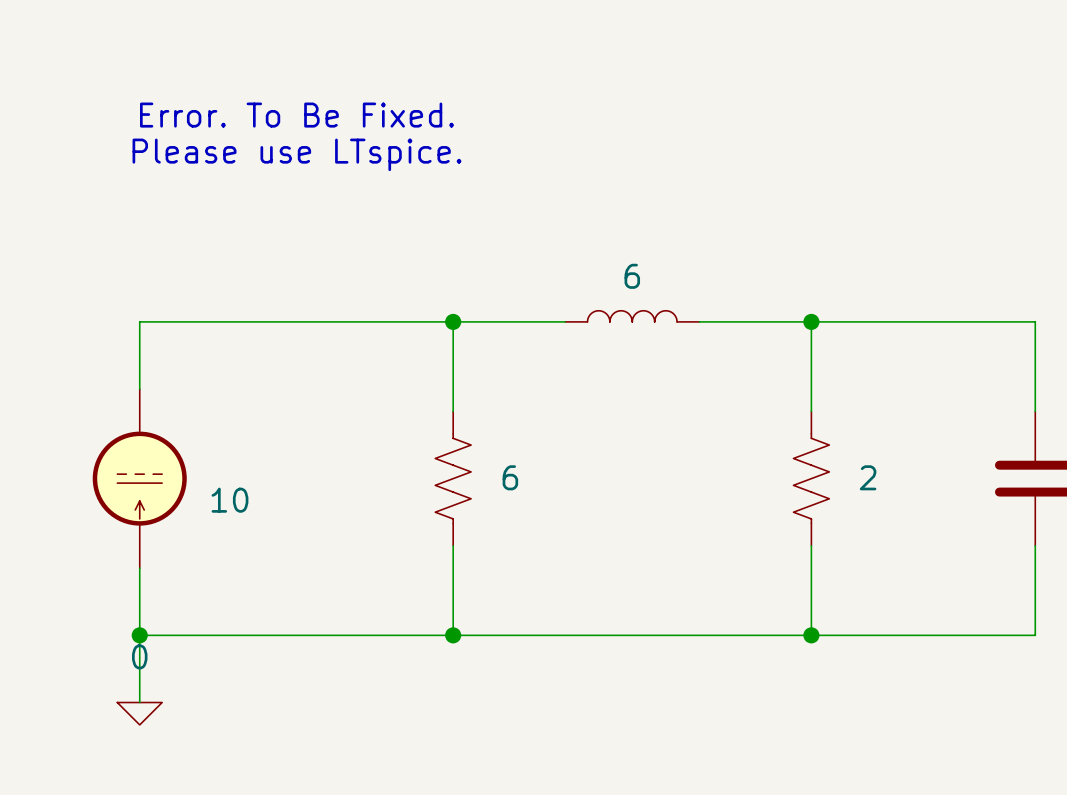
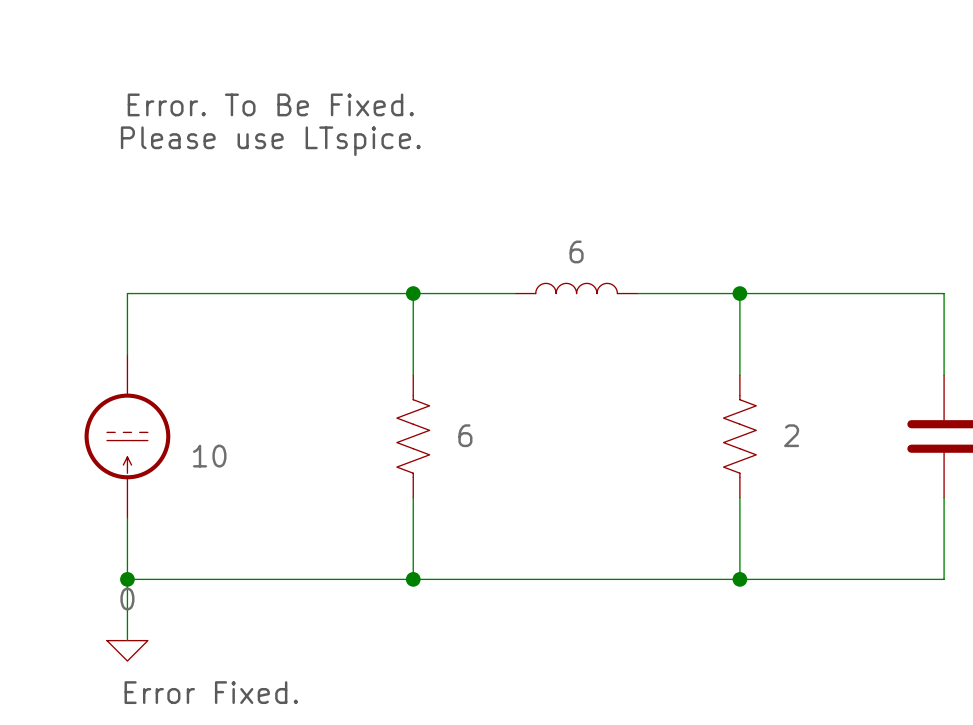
text: none -> Error Fixed. (211, 692)

